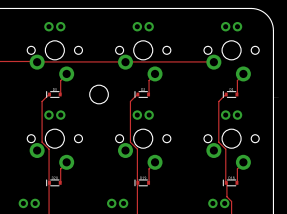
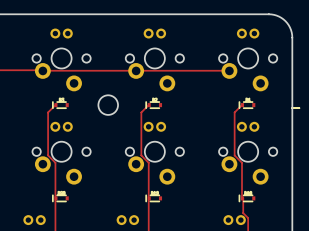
track: (66, 73) (60, 80) (60, 94) -> none
track: (155, 73) (149, 80) (148, 94) -> none
track: (243, 73) (237, 80) (236, 94) -> none
track: (66, 162) (60, 168) (60, 182) -> none
track: (155, 162) (149, 168) (148, 182) -> none
track: (243, 162) (237, 168) (236, 182) -> none

